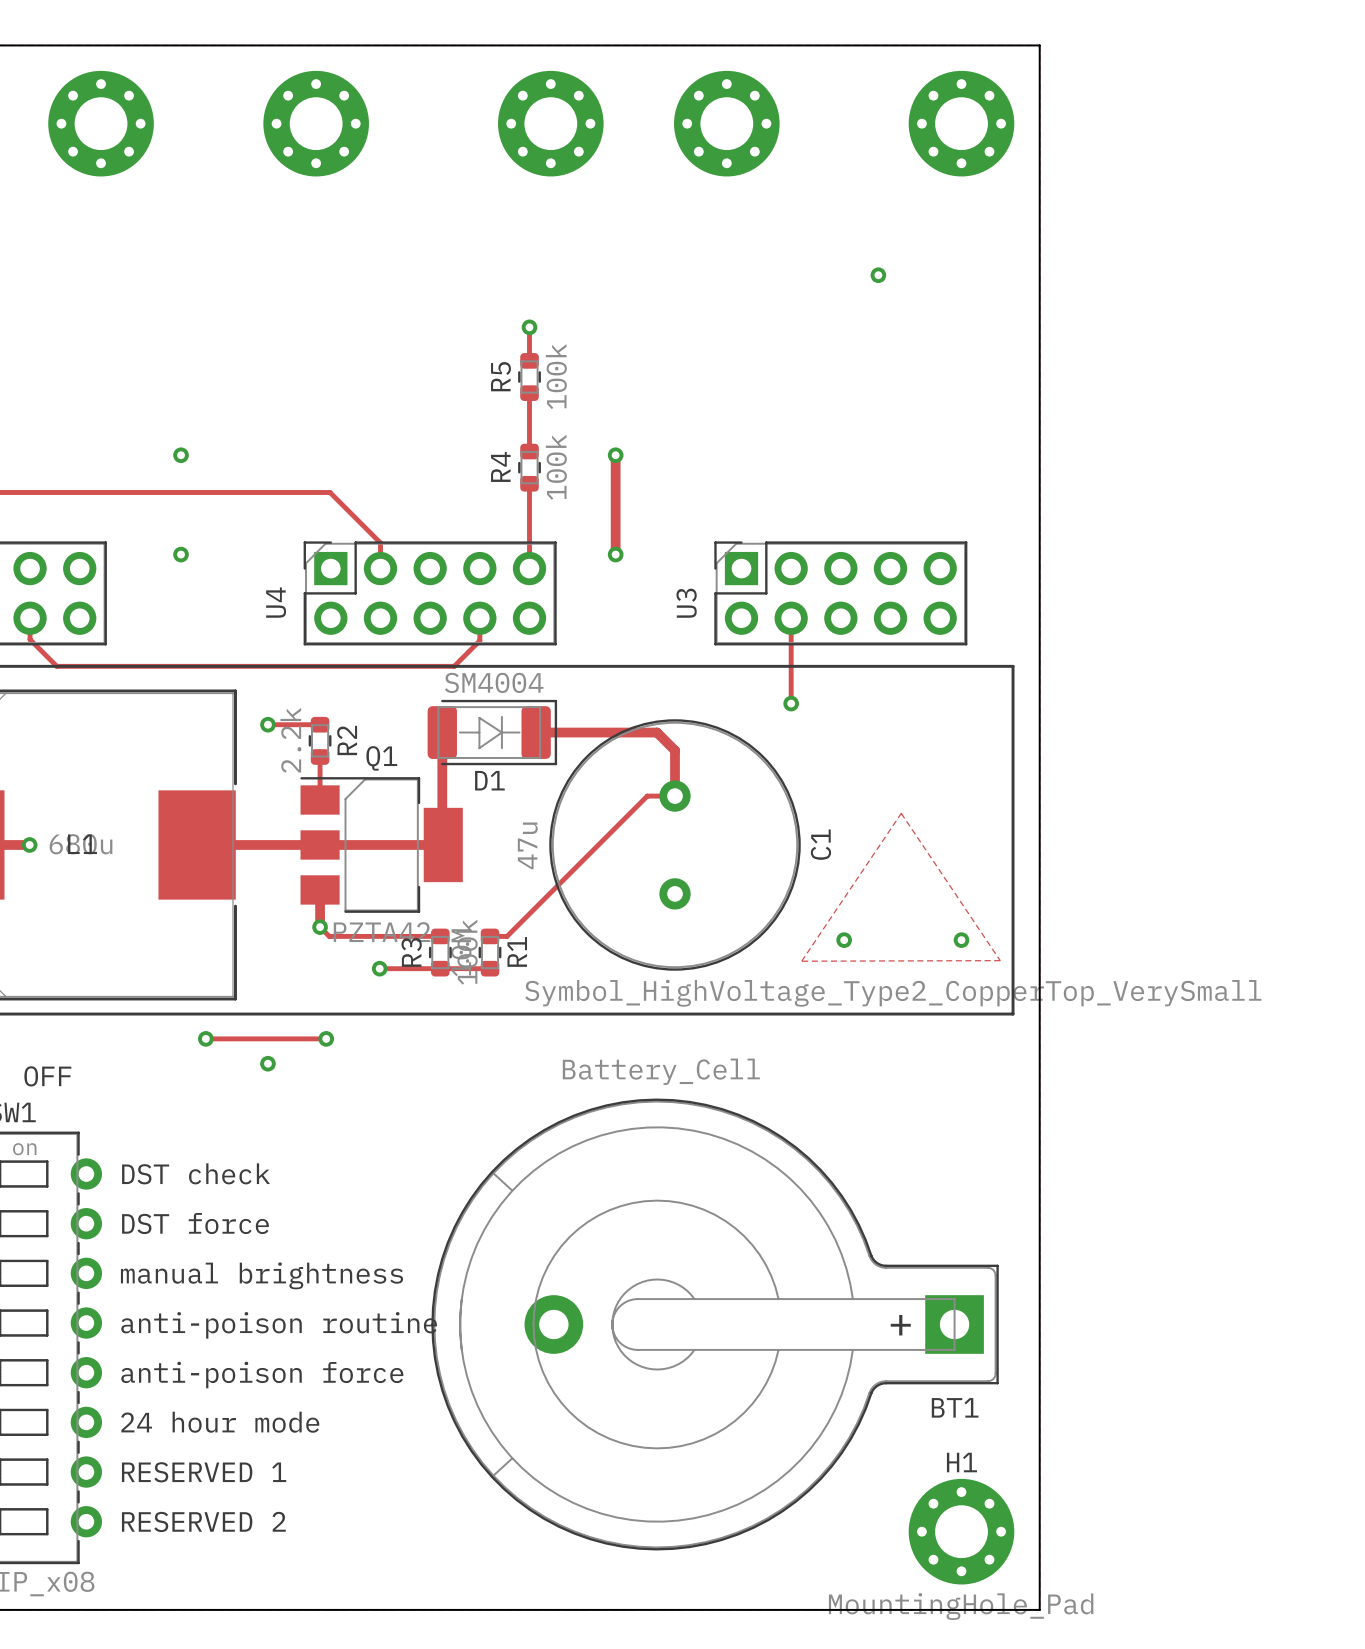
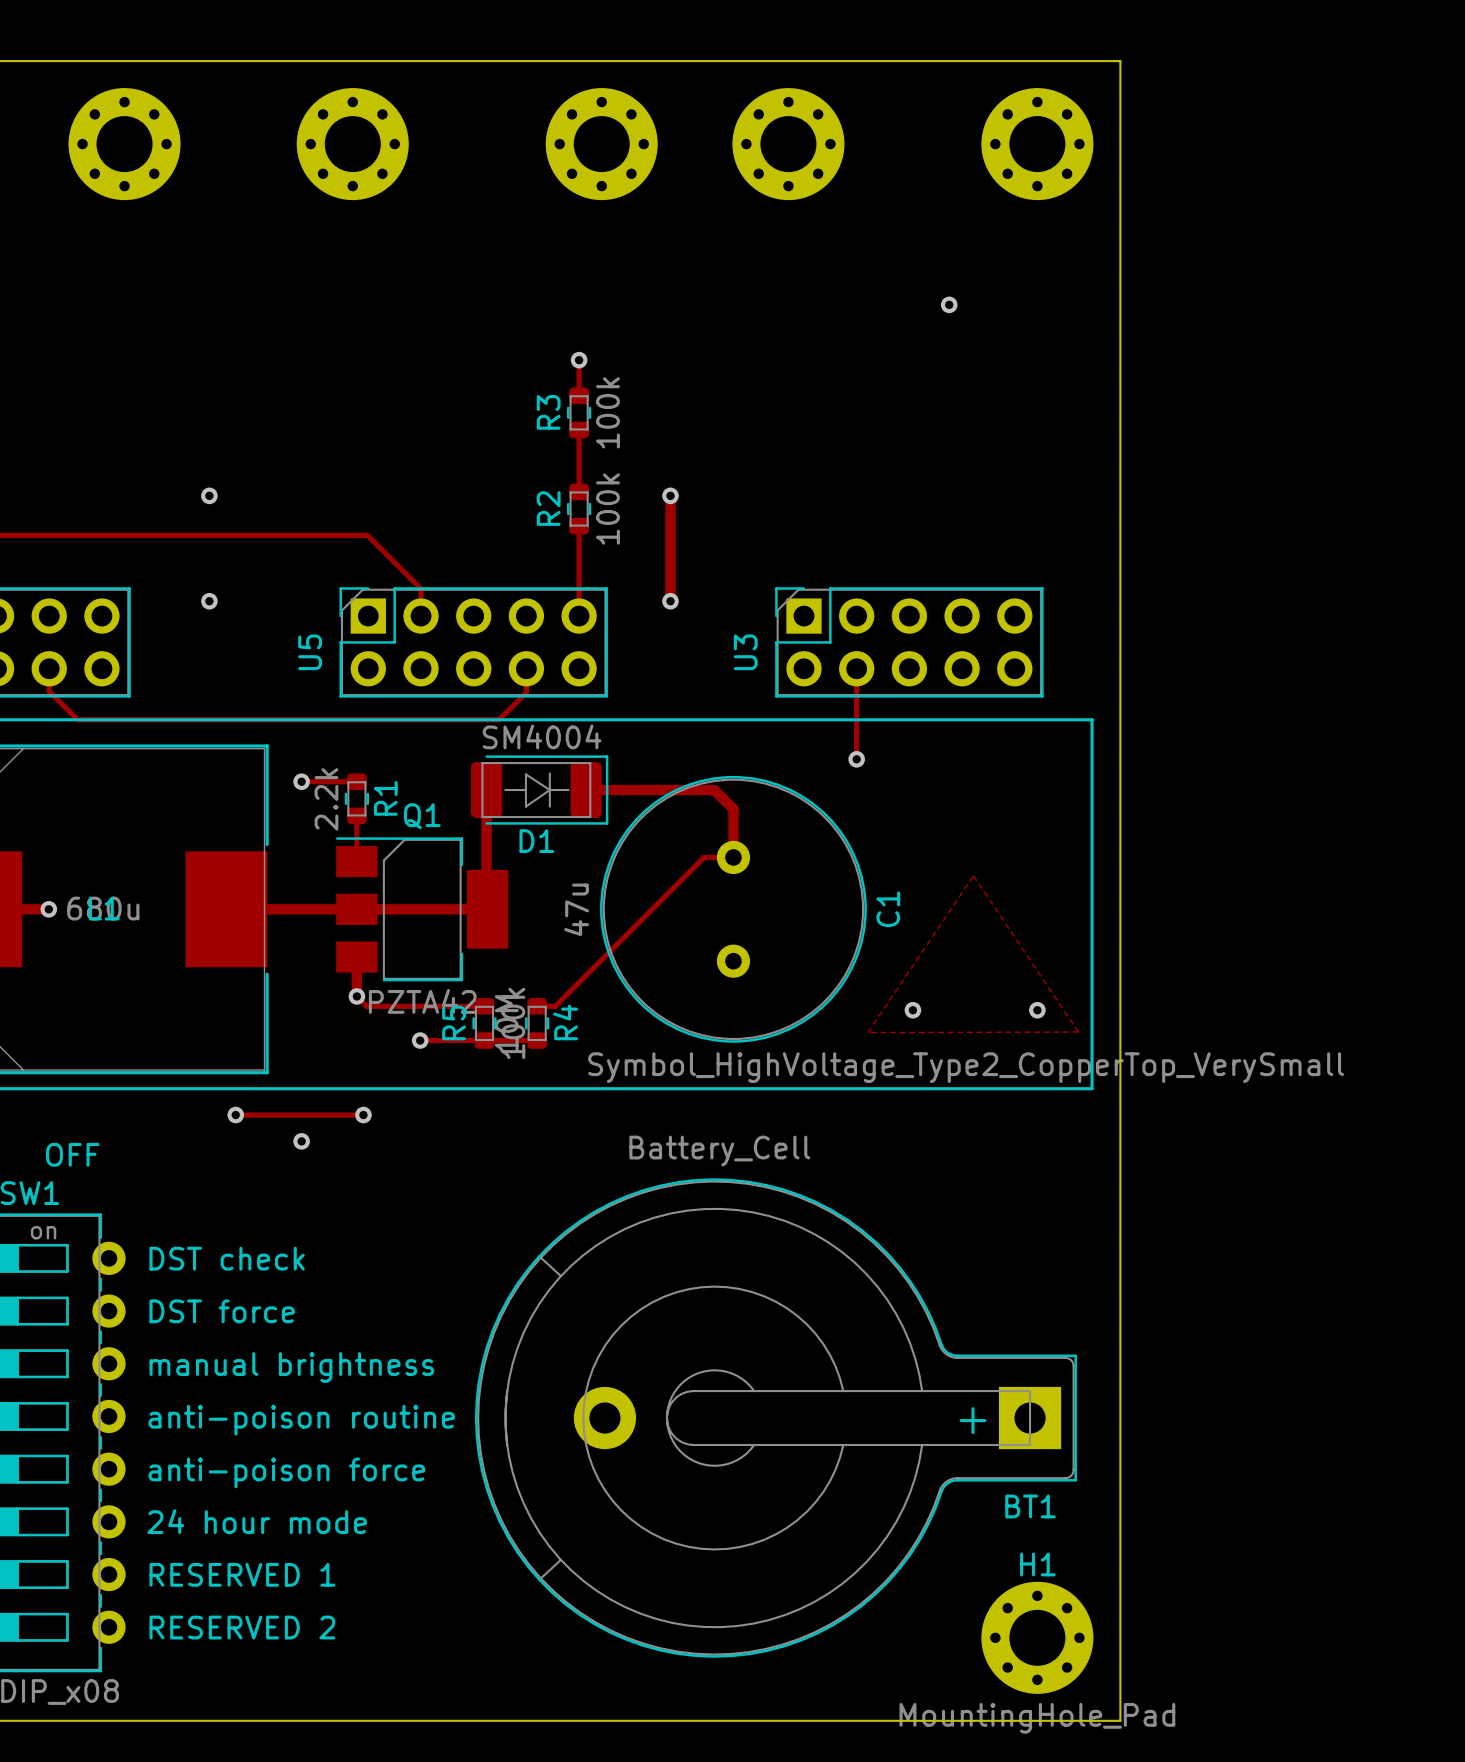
R5 name: R5 (500, 376) -> R3 (548, 412)
R4 name: R4 (500, 466) -> R2 (548, 508)
U4 name: U4 (276, 602) -> U5 (310, 652)
R2 name: R2 (347, 740) -> R1 (385, 798)
R1 name: R1 (517, 951) -> R4 (565, 1022)
R3 name: R3 (411, 952) -> R5 (454, 1022)

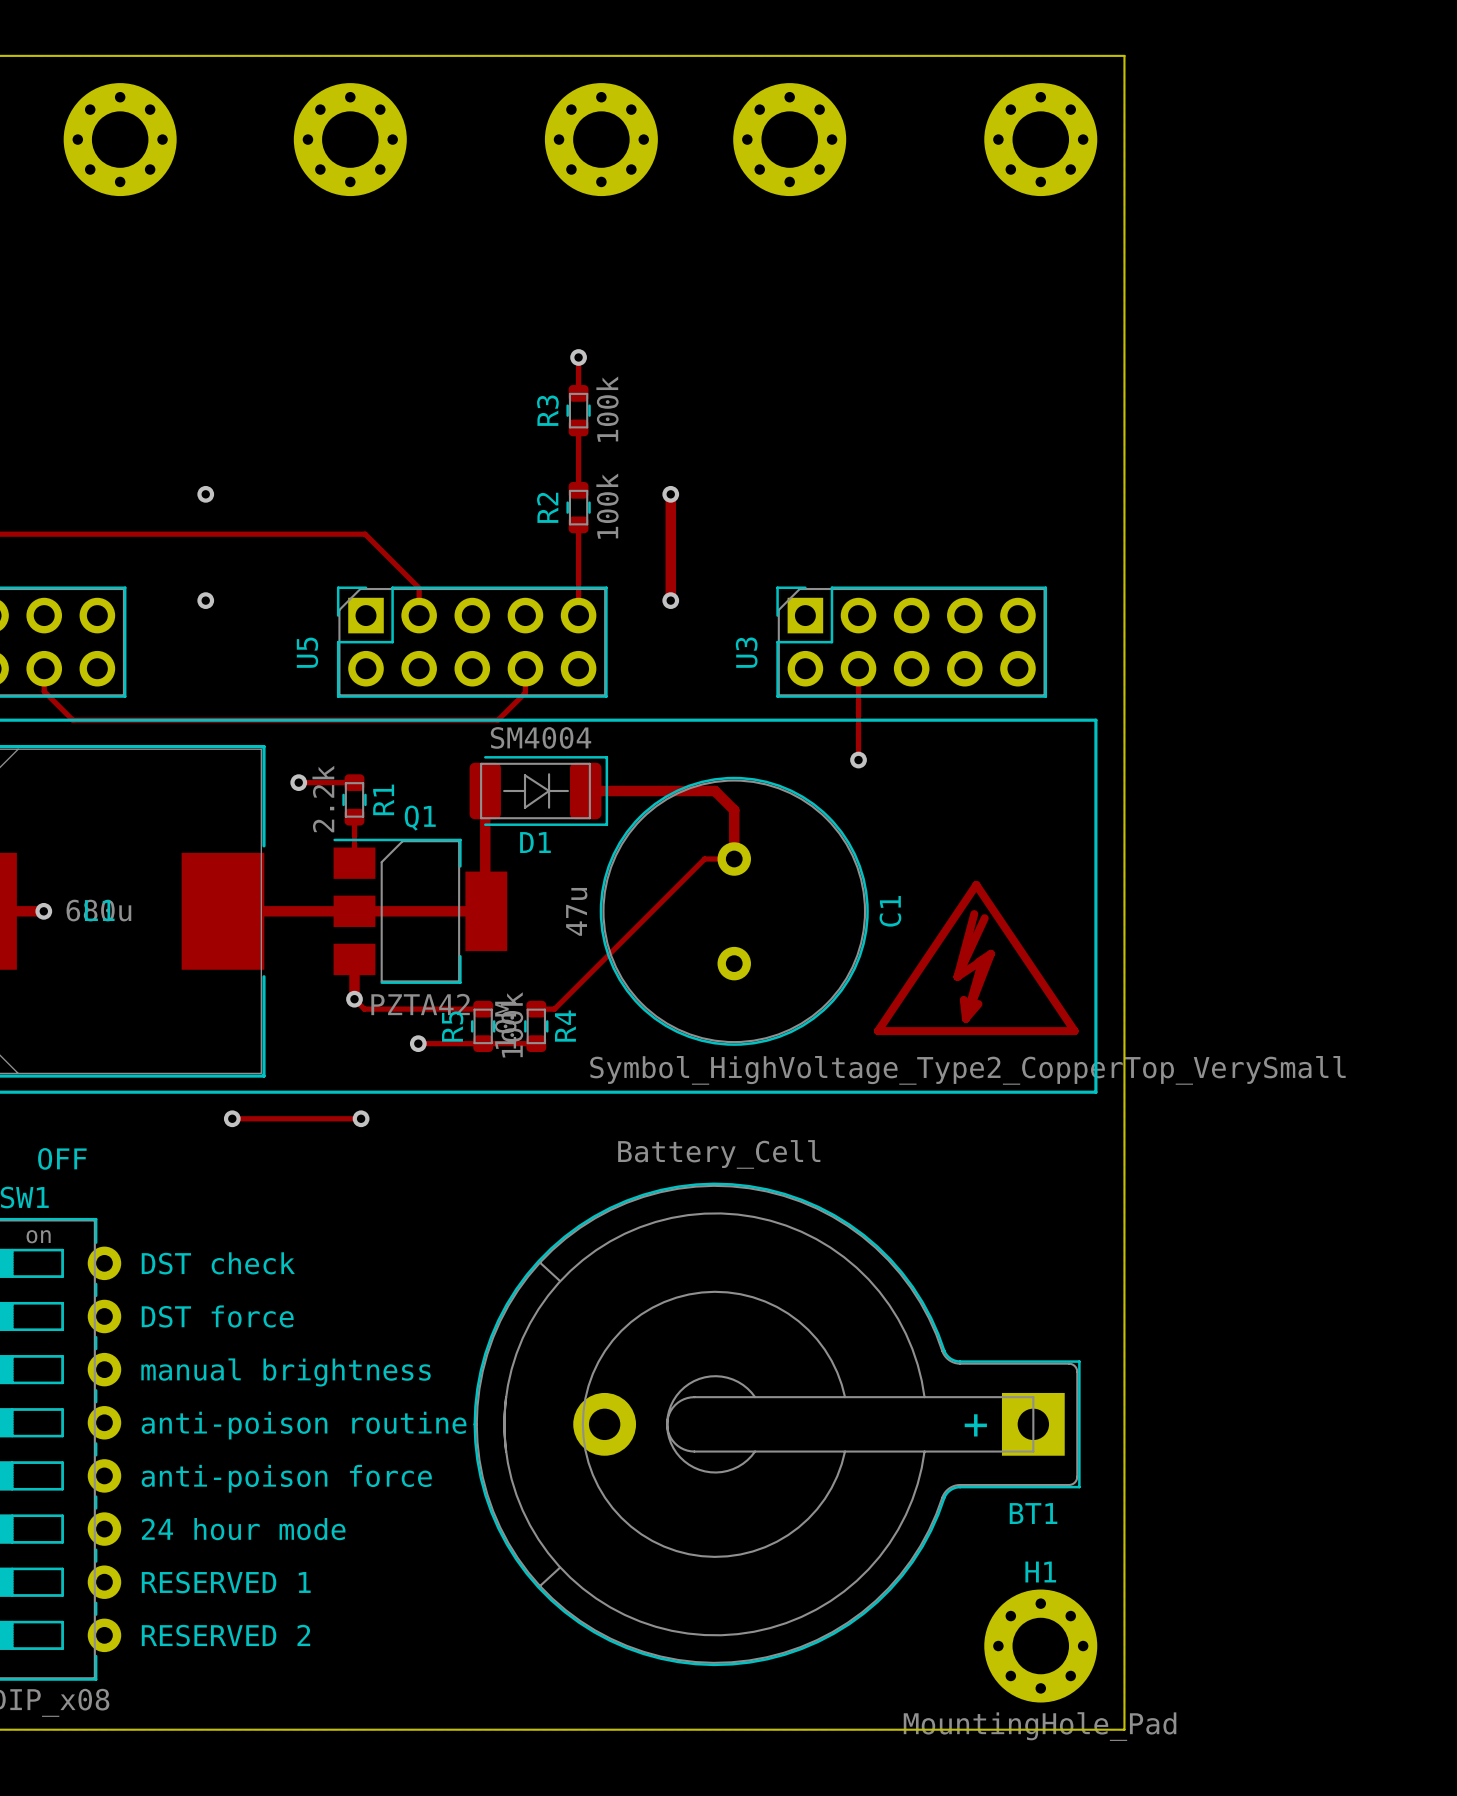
via: (949, 304) -> none
zone outline: (973, 875) (867, 1032) (1078, 1032) (973, 875) -> none
drawing: none -> [874, 880, 1079, 1036]
via: (912, 1010) -> none
via: (1037, 1010) -> none
via: (301, 1141) -> none

